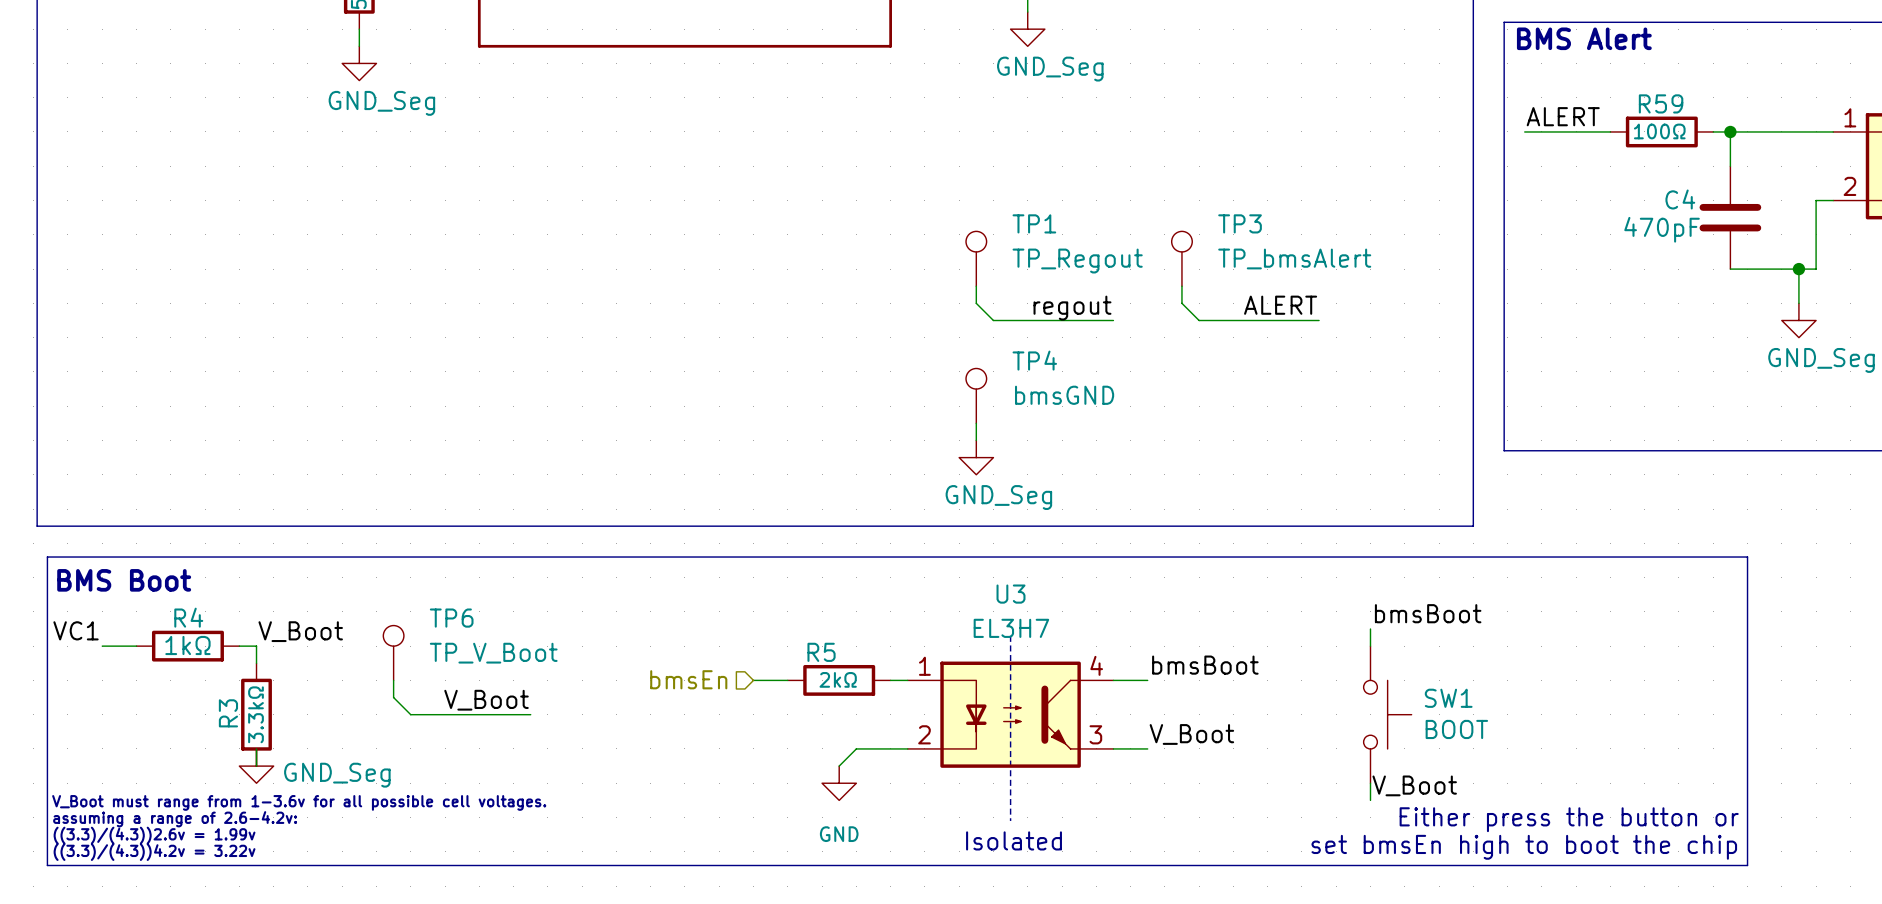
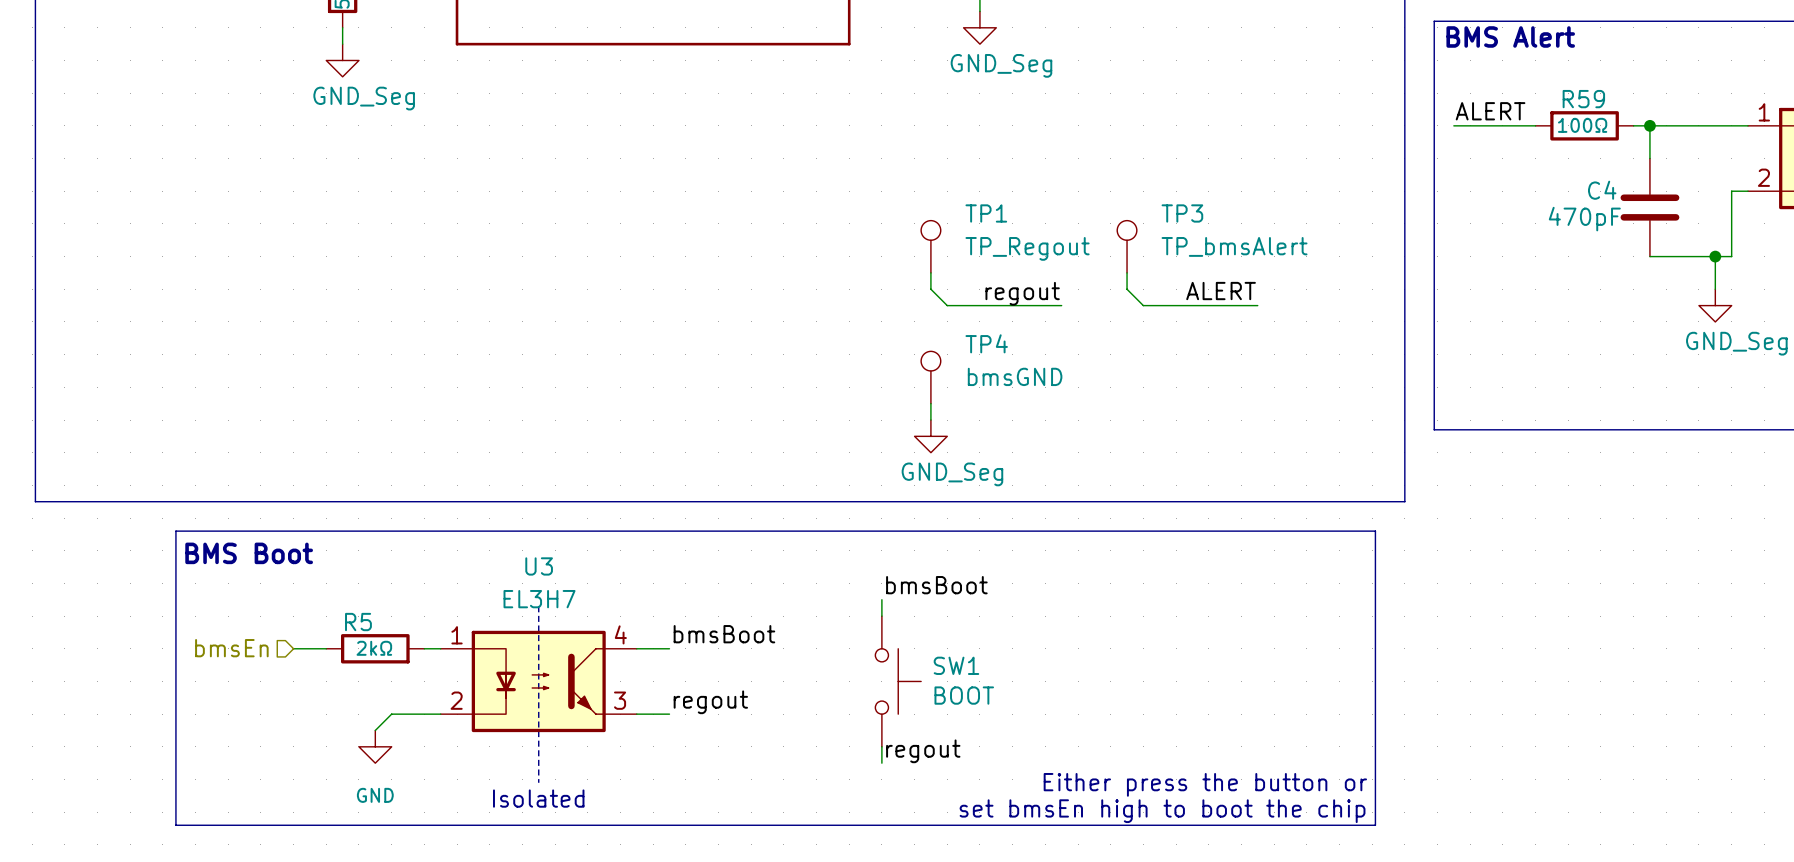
line: (184, 557) (47, 557) (47, 865) (184, 865) -> (175, 531) (175, 825)
line: (1442, 557) (1747, 557) (1747, 865) (1442, 865) -> (1375, 531) (1375, 825)
text position: BMS Boot (124, 580) -> BMS Boot (249, 553)
label: none -> bmsBoot (936, 585)
label: bmsBoot (1428, 613) -> none
wire: none -> (881, 599) (881, 616)
wire: (1370, 628) (1370, 646) -> none
label: VC1 (76, 630) -> none
label: V_Boot (300, 631) -> none
line: none -> (538, 606) (538, 782)
line: (1010, 635) (1010, 820) -> none
wire: (102, 646) (136, 646) -> (293, 648) (326, 648)
R4: 1kΩ (187, 646) -> none
wire: (239, 646) (256, 646) (256, 663) -> none
TP6: TP_V_Boot (393, 652) -> none
label: none -> bmsBoot (724, 634)
label: bmsBoot (1205, 665) -> none
hierarchical label: none -> bmsEn (231, 648)
hierarchical label: bmsEn (688, 679) -> none
wire: (393, 680) (393, 697) (410, 714) (530, 714) -> none
wire: none -> (424, 648) (440, 648)
wire: (753, 680) (787, 680) -> (636, 648) (669, 648)
R5 position: (839, 680) -> (375, 648)
wire: (890, 680) (907, 680) -> none
wire: (1113, 680) (1147, 680) -> none
label: V_Boot (486, 700) -> none
R3: 3.3kΩ (256, 714) -> none
U3 position: (1010, 714) -> (538, 681)
SW1 position: (1387, 714) -> (898, 681)
label: V_Boot (1191, 734) -> none
label: none -> regout (710, 702)
wire: (256, 748) (256, 766) -> none
wire: none -> (440, 714) (391, 714) (375, 730)
wire: none -> (636, 714) (669, 714)
wire: (907, 748) (856, 748) (839, 766) -> none
wire: (1113, 748) (1147, 748) -> none
power symbol: GND_Seg (256, 766) -> none
power symbol: none -> GND (375, 746)
power symbol: GND (839, 783) -> none
wire: none -> (881, 746) (881, 763)
wire: (1370, 783) (1370, 800) -> none
label: V_Boot (1414, 785) -> none
label: none -> regout (923, 751)
text: V_Boot must range from 1-3.6v for all possible cell voltages. (299, 802) -> none
text: assuming a range of 2.6-4.2v: (175, 819) -> none
text position: Either press the button or (1569, 819) -> Either press the button or (1205, 784)
text: ((3.3)/(4.3))2.6v = 1.99v (154, 835) -> none
text: none -> Isolated (538, 798)
text: Isolated (1014, 840) -> none
text position: set bmsEn high to boot the chip (1524, 847) -> set bmsEn high to boot the chip (1162, 811)
text: ((3.3)/(4.3))4.2v = 3.22v (154, 852) -> none

